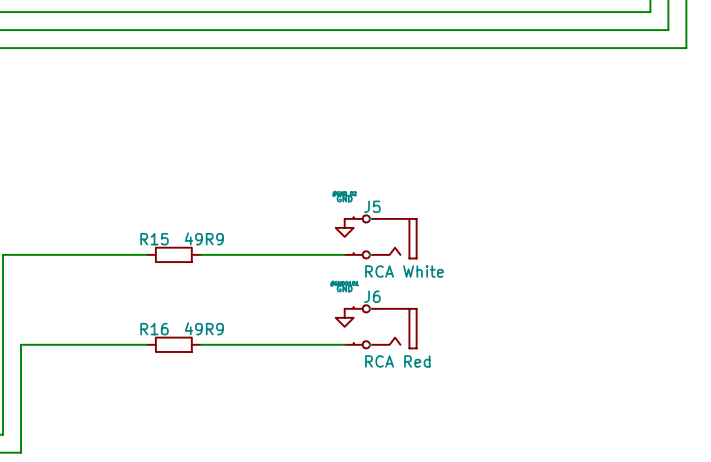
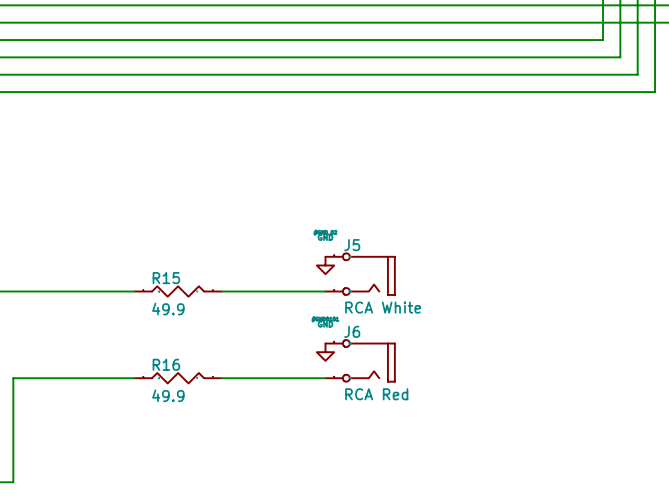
R15 value: 49R9 (204, 238) -> 49.9 (168, 309)
R15 symbol: [146, 246, 201, 263] -> [134, 285, 222, 298]
R16 value: 49R9 (204, 328) -> 49.9 (168, 395)
R16 symbol: [146, 336, 201, 353] -> [134, 372, 222, 385]

